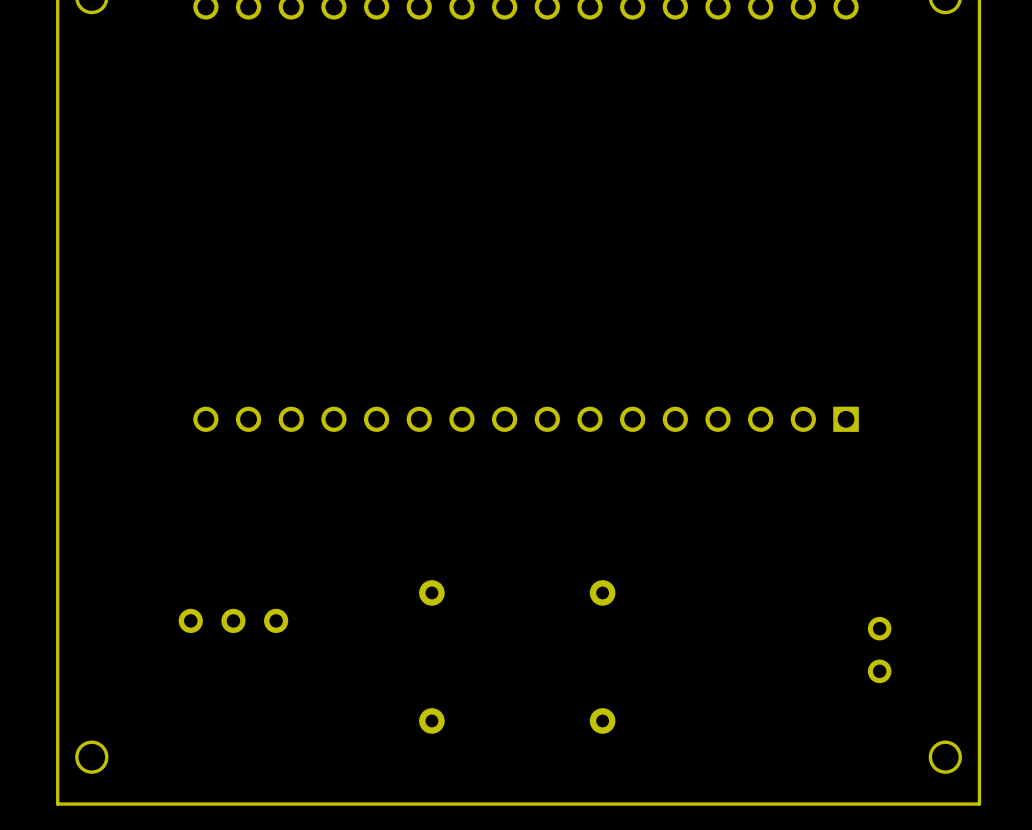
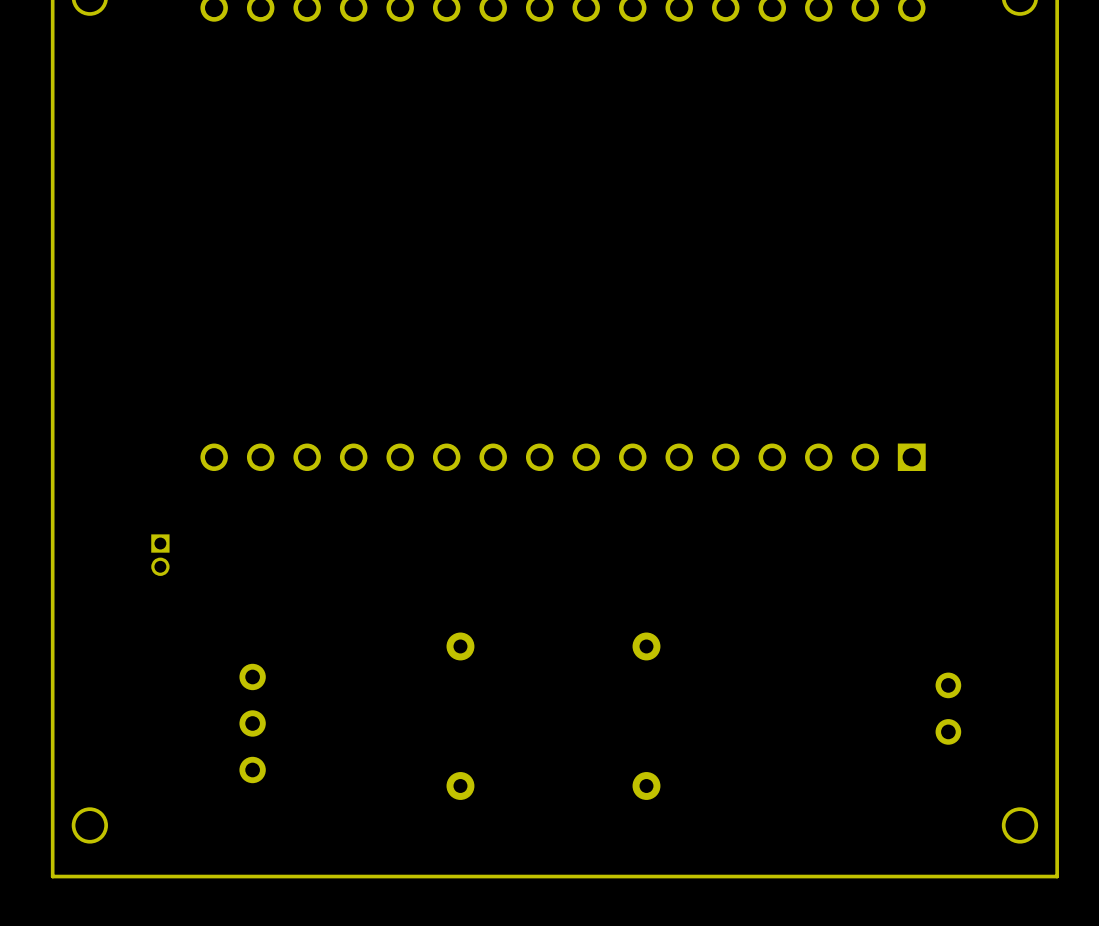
part: none -> (160, 555)
part rotation: 0° (233, 620) -> 90° clockwise (252, 723)

